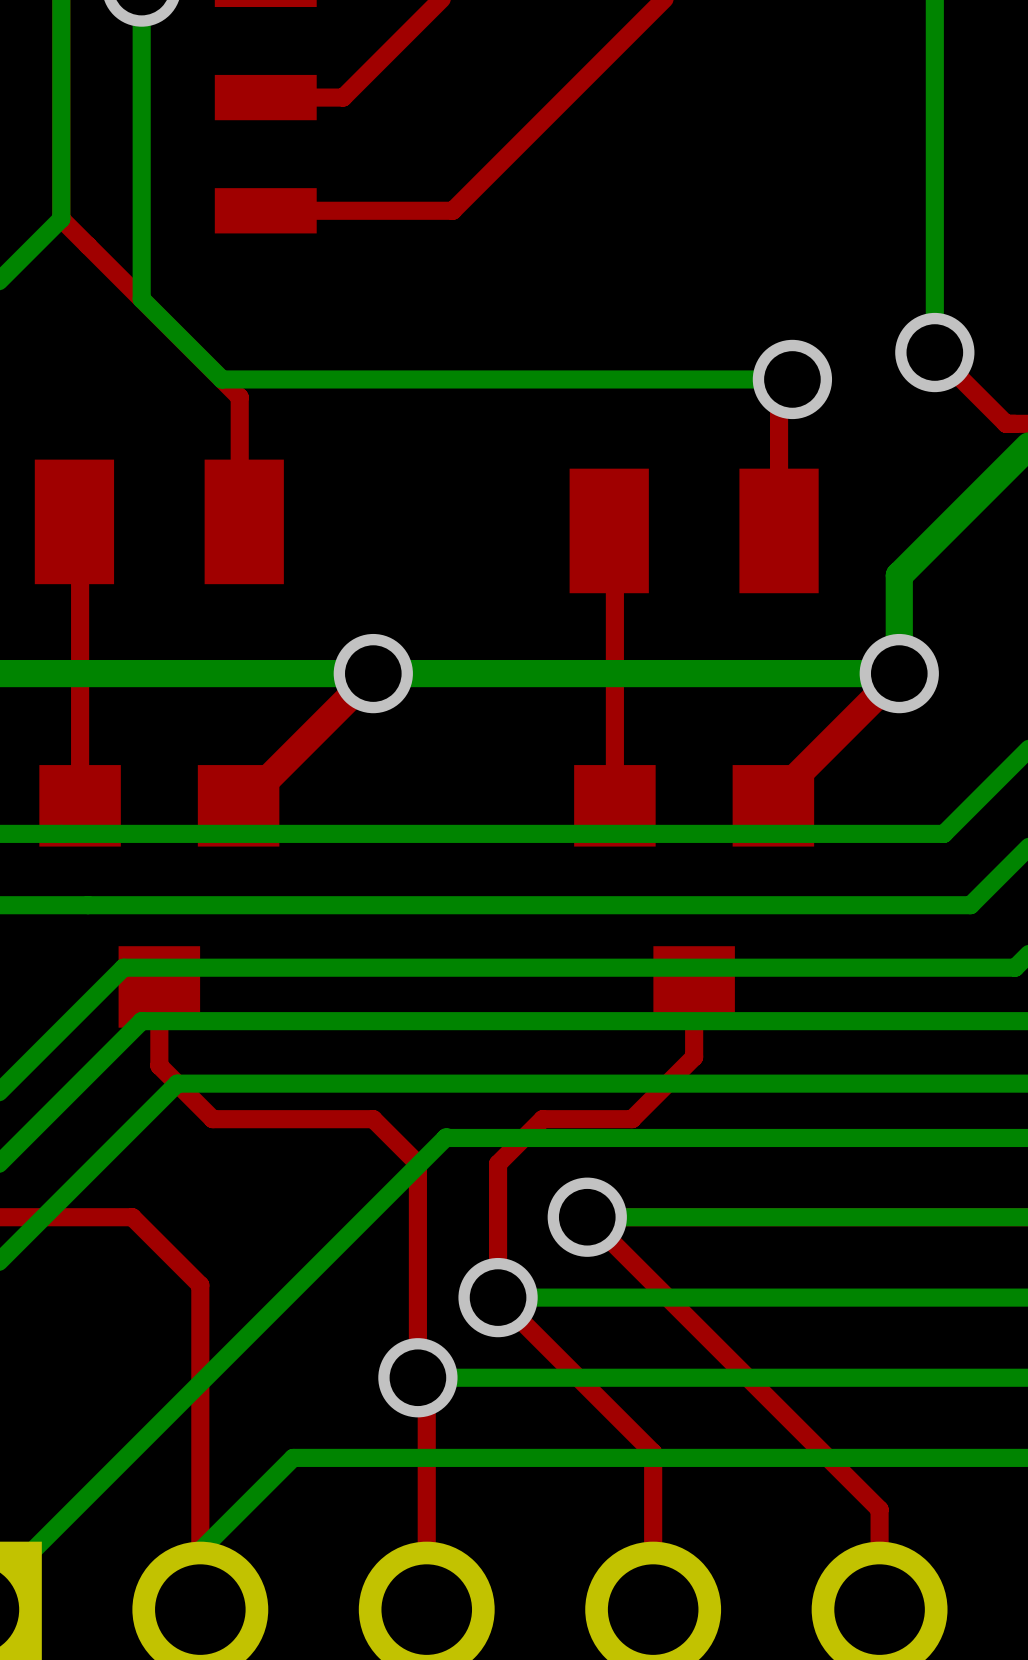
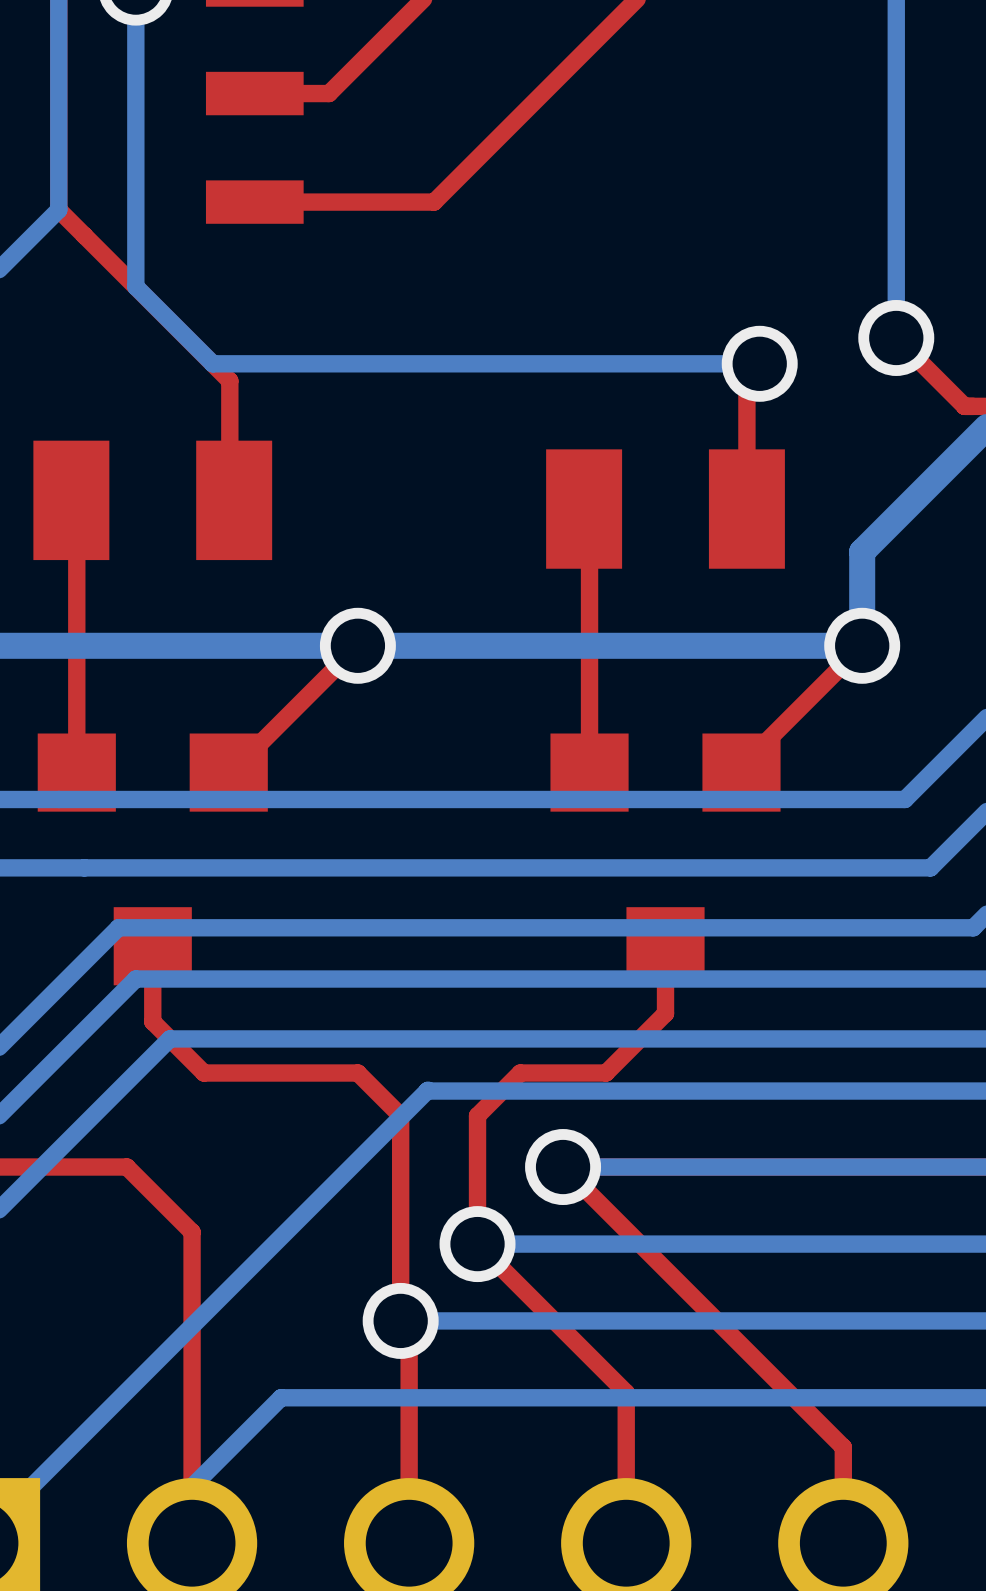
top track width: thick (373, 673) (241, 805) (238, 805) -> thin (357, 645) (231, 772) (228, 772)
top track width: thick (899, 673) (773, 799) (773, 805) -> thin (862, 645) (741, 766) (741, 772)

